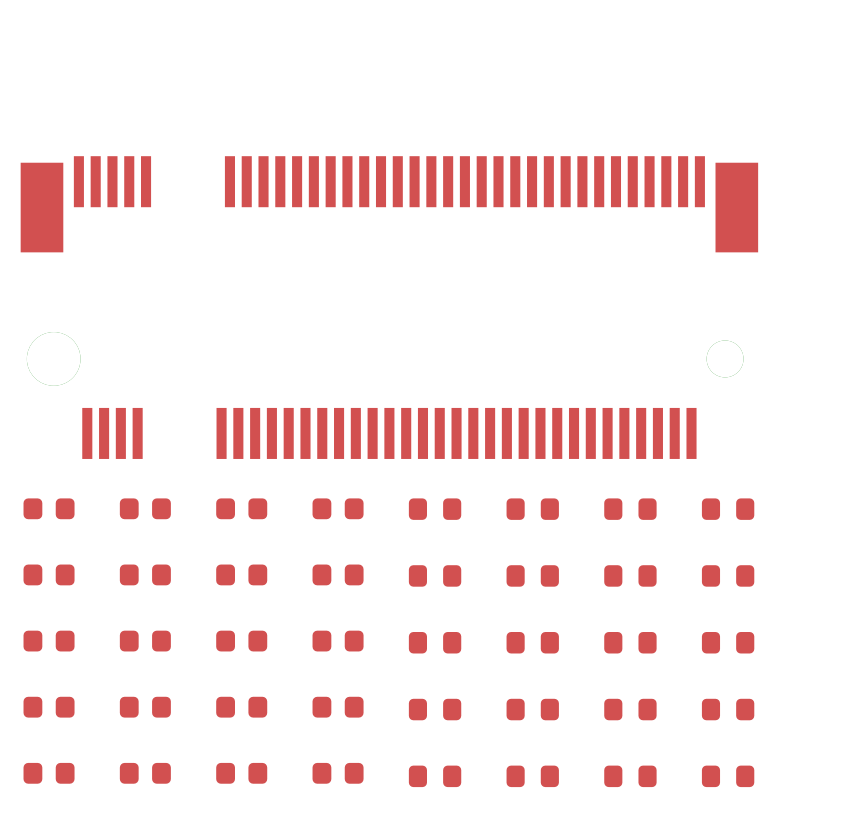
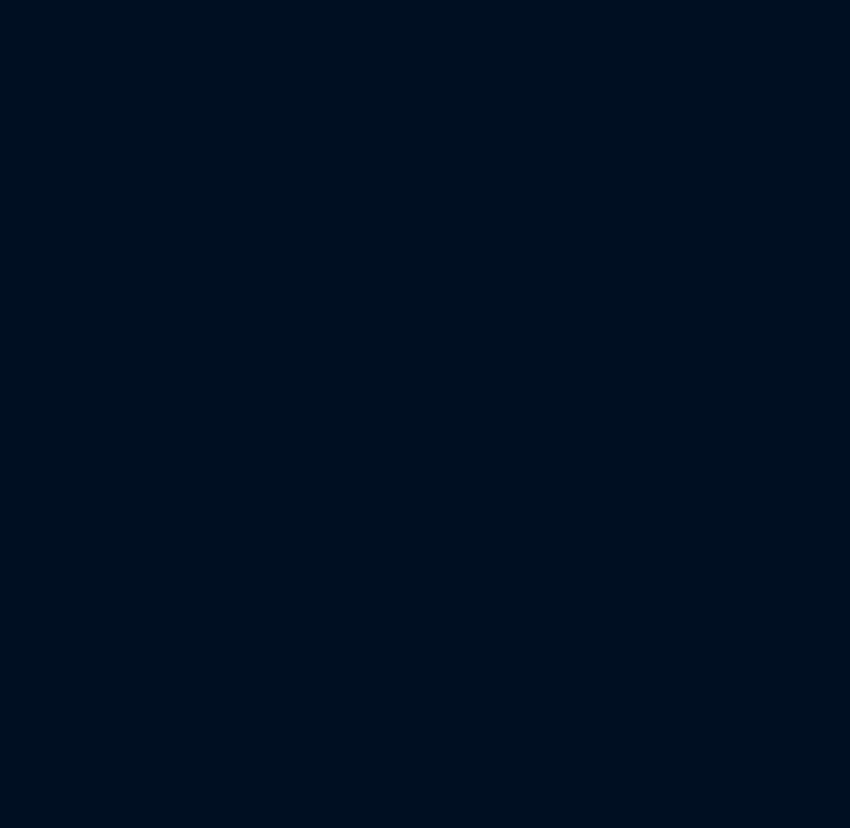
part: (389, 307) -> none
part: (49, 508) -> none
part: (145, 508) -> none
part: (241, 508) -> none
part: (338, 508) -> none
part: (435, 509) -> none
part: (532, 509) -> none
part: (630, 509) -> none
part: (728, 509) -> none
part: (49, 574) -> none
part: (145, 574) -> none
part: (241, 574) -> none
part: (338, 574) -> none
part: (435, 575) -> none
part: (532, 575) -> none
part: (630, 575) -> none
part: (728, 575) -> none
part: (49, 641) -> none
part: (145, 641) -> none
part: (241, 641) -> none
part: (338, 641) -> none
part: (435, 642) -> none
part: (532, 642) -> none
part: (630, 642) -> none
part: (728, 642) -> none
part: (49, 707) -> none
part: (145, 707) -> none
part: (241, 707) -> none
part: (338, 707) -> none
part: (435, 709) -> none
part: (532, 709) -> none
part: (630, 709) -> none
part: (728, 709) -> none
part: (49, 773) -> none
part: (145, 773) -> none
part: (241, 773) -> none
part: (338, 773) -> none
part: (435, 776) -> none
part: (532, 776) -> none
part: (630, 776) -> none
part: (728, 776) -> none

